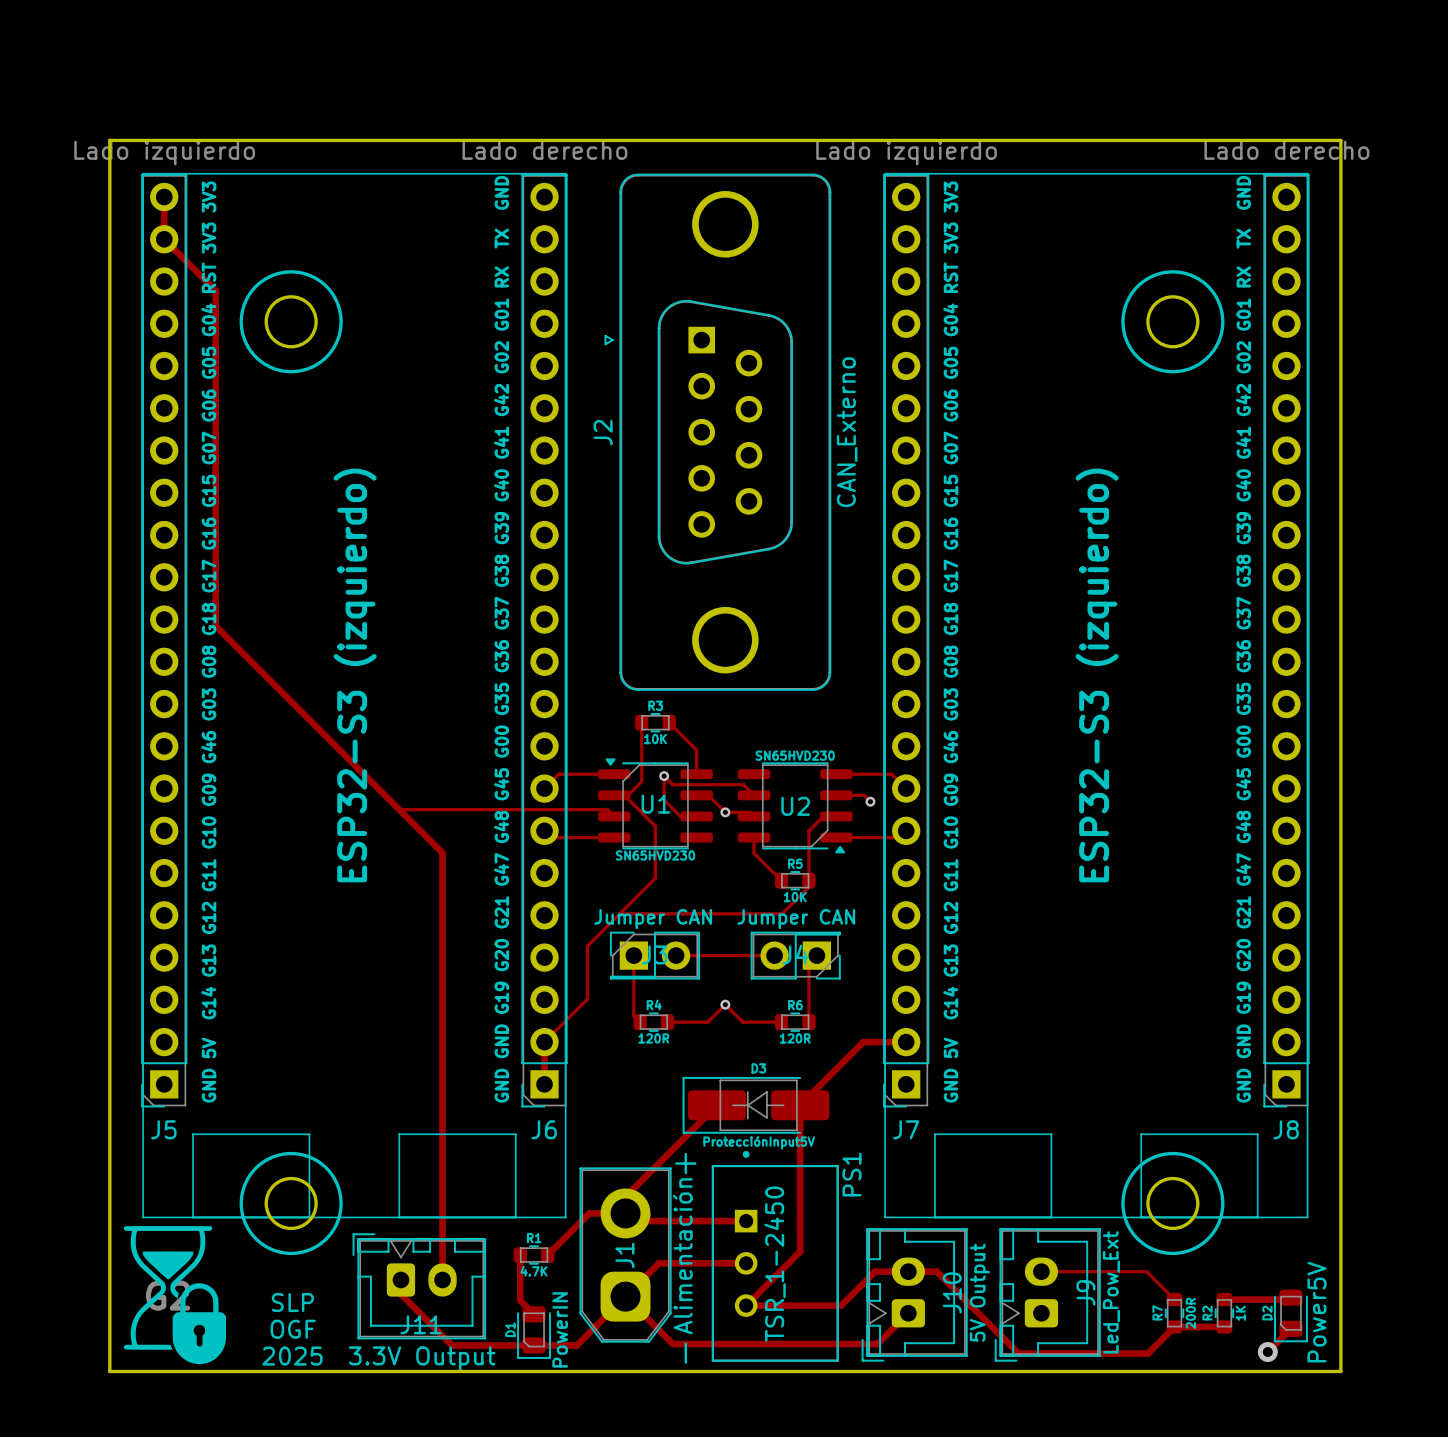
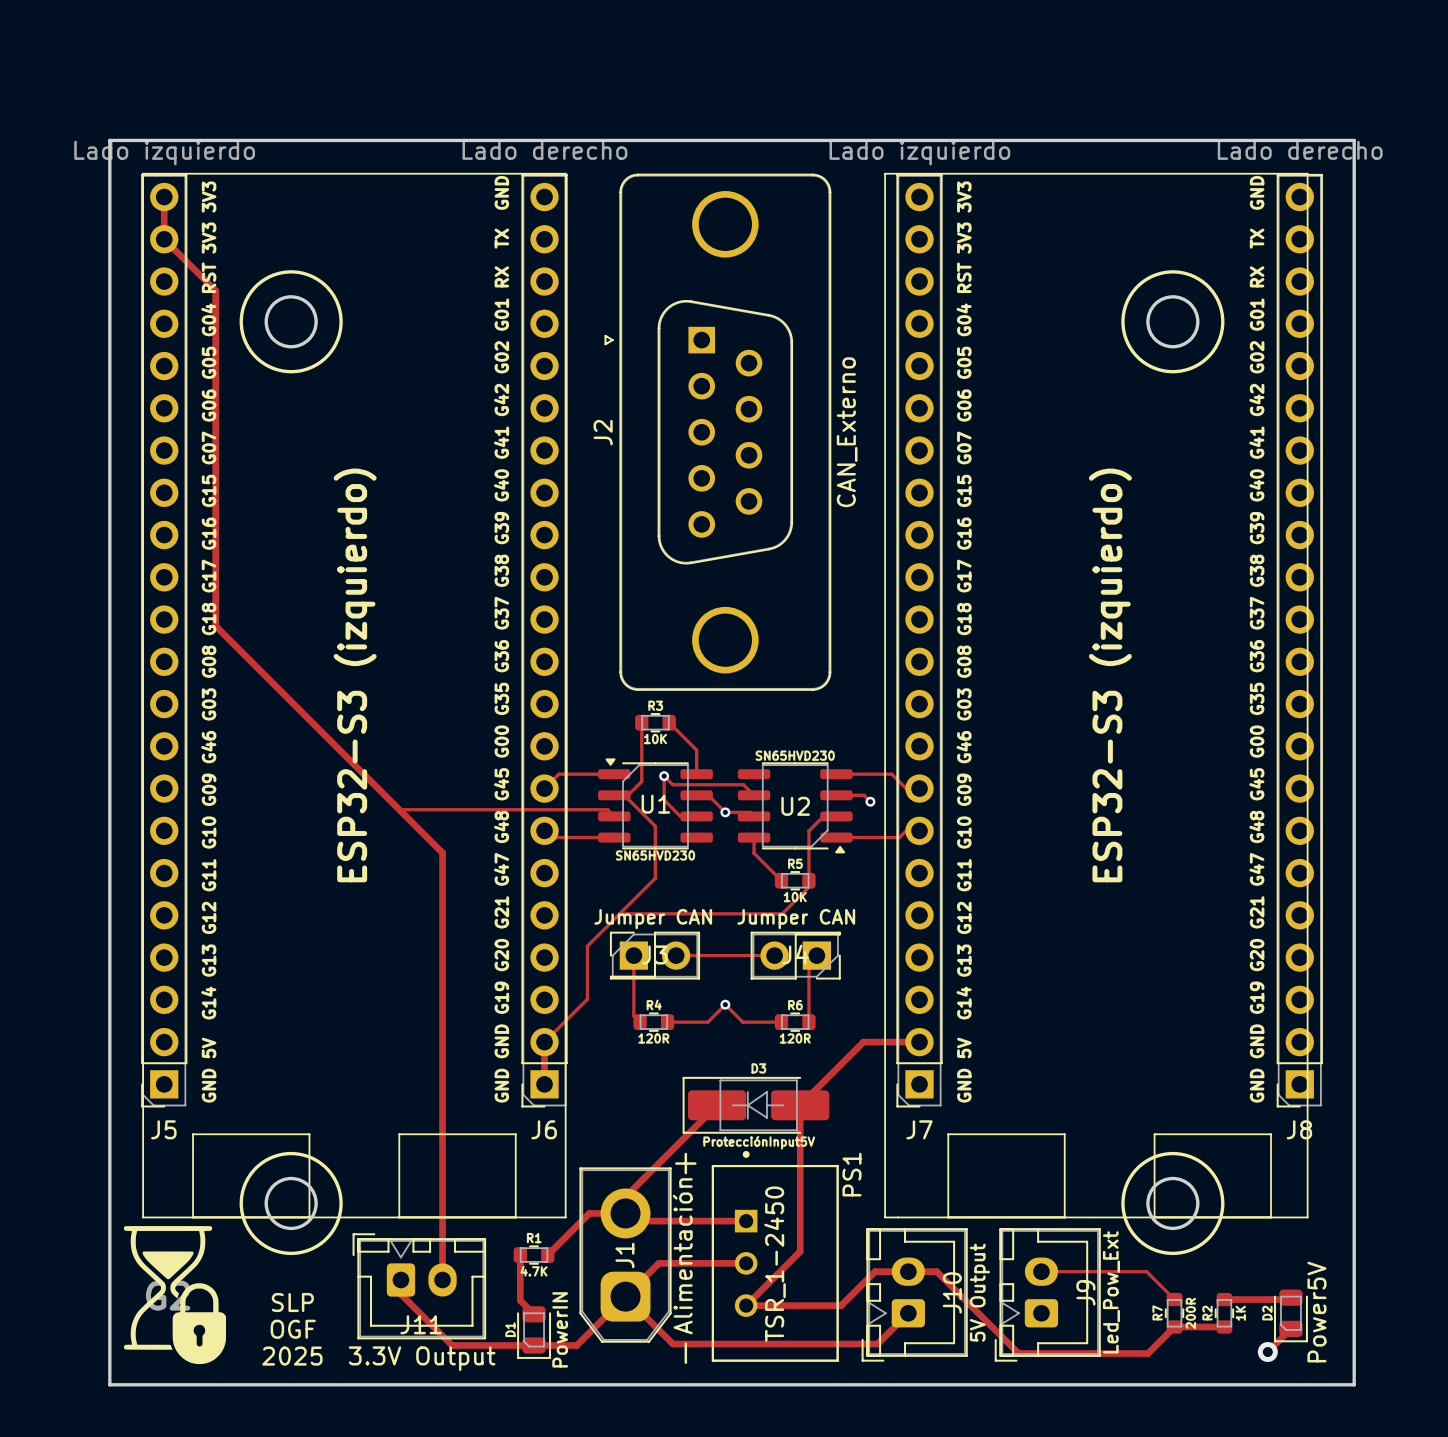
board edge: (1340, 140) (1340, 1371) (109, 1371) -> (1340, 140) (1354, 140) (1354, 1384) (109, 1384) (109, 1371)
text position: GND GND G19 G20 G21 G47 G48 G45 G00 G35 G36 G37 G38 G39 G40 G41 G42 G02 G01 RX TX GND (1243, 639) -> GND GND G19 G20 G21 G47 G48 G45 G00 G35 G36 G37 G38 G39 G40 G41 G42 G02 G01 RX TX GND (1256, 639)
J7 position: (906, 640) -> (919, 640)
J8 position: (1286, 640) -> (1299, 640)
text position: GND 5V G14 G13 G12 G11 G10 G09 G46 G03 G08 G18 G17 G16 G15 G07 G06 G05 G04 RST 3V3 3V3 (950, 642) -> GND 5V G14 G13 G12 G11 G10 G09 G46 G03 G08 G18 G17 G16 G15 G07 G06 G05 G04 RST 3V3 3V3 (964, 642)
text position: ESP32-S3 (izquierdo) (1097, 675) -> ESP32-S3 (izquierdo) (1110, 675)
line: (948, 1134) (934, 1134) (934, 1217) -> (948, 1134) (948, 1217)
line: (1051, 1134) (1051, 1217) -> (1051, 1134) (1064, 1134) (1064, 1217)
line: (1154, 1134) (1141, 1134) (1141, 1217) -> (1154, 1134) (1154, 1217)
line: (1257, 1134) (1257, 1217) -> (1257, 1134) (1271, 1134) (1271, 1217)

